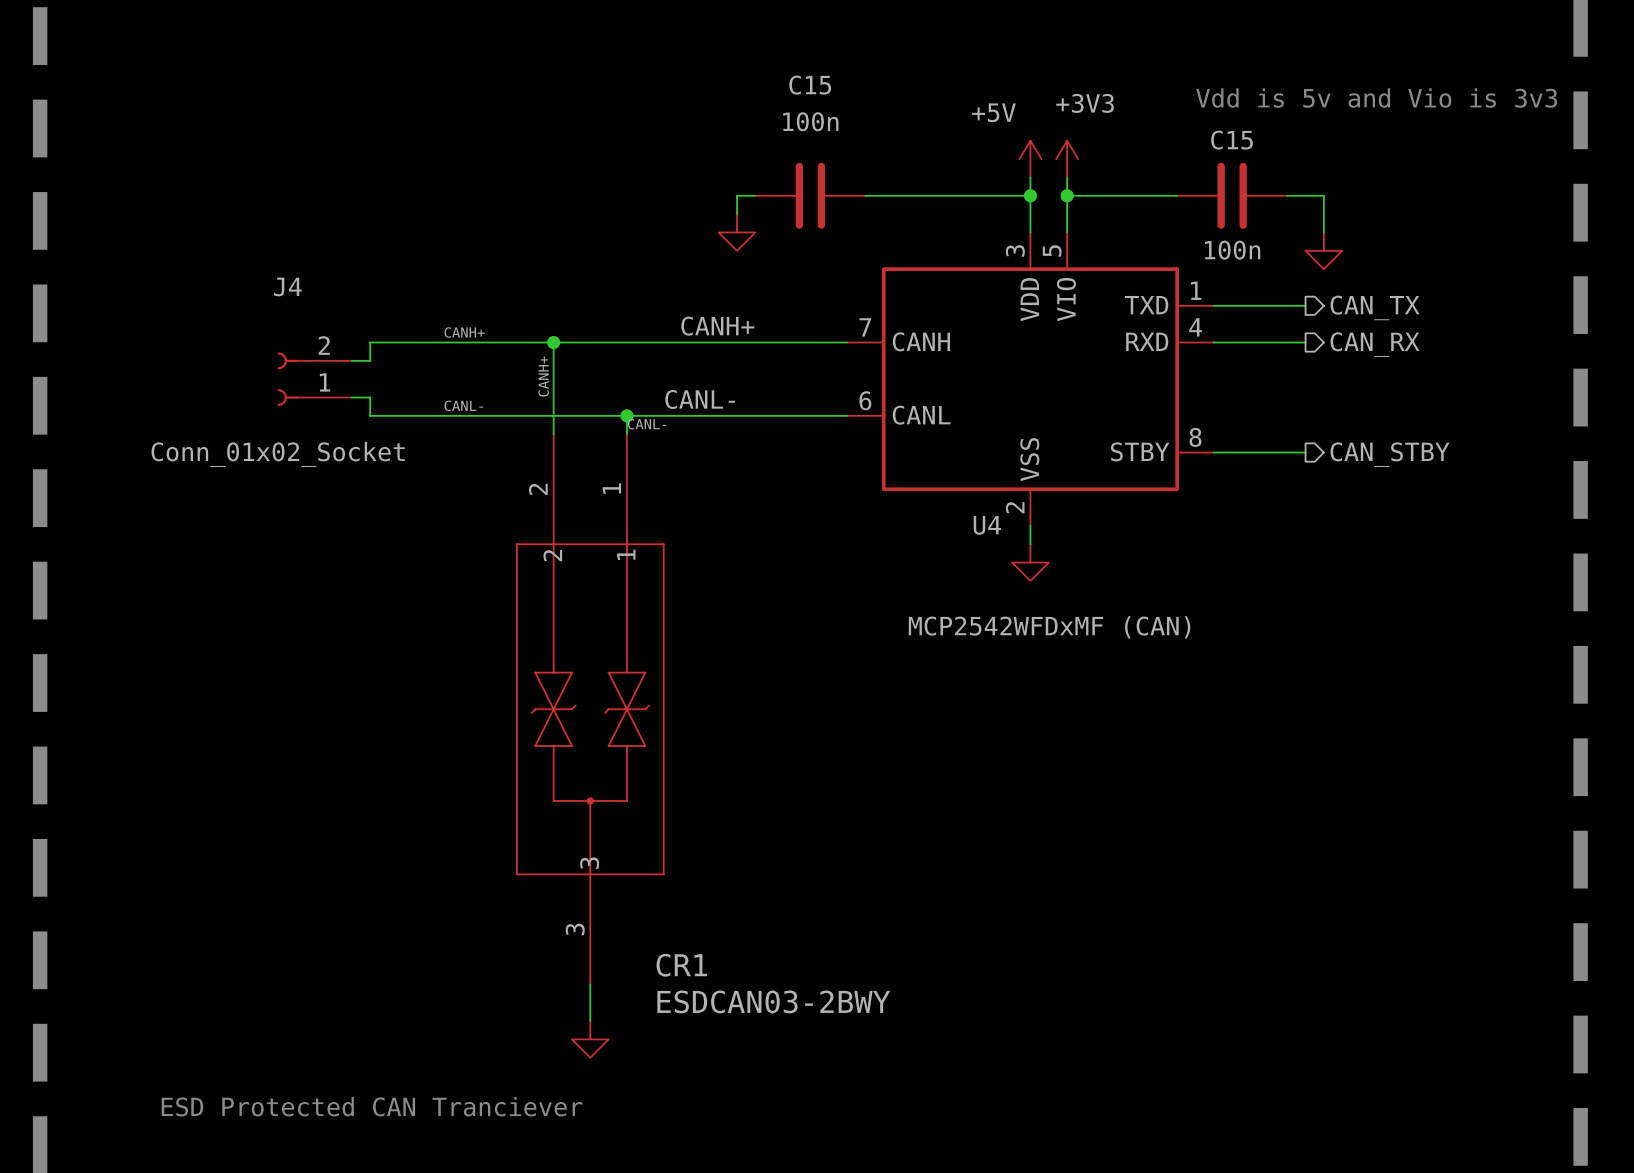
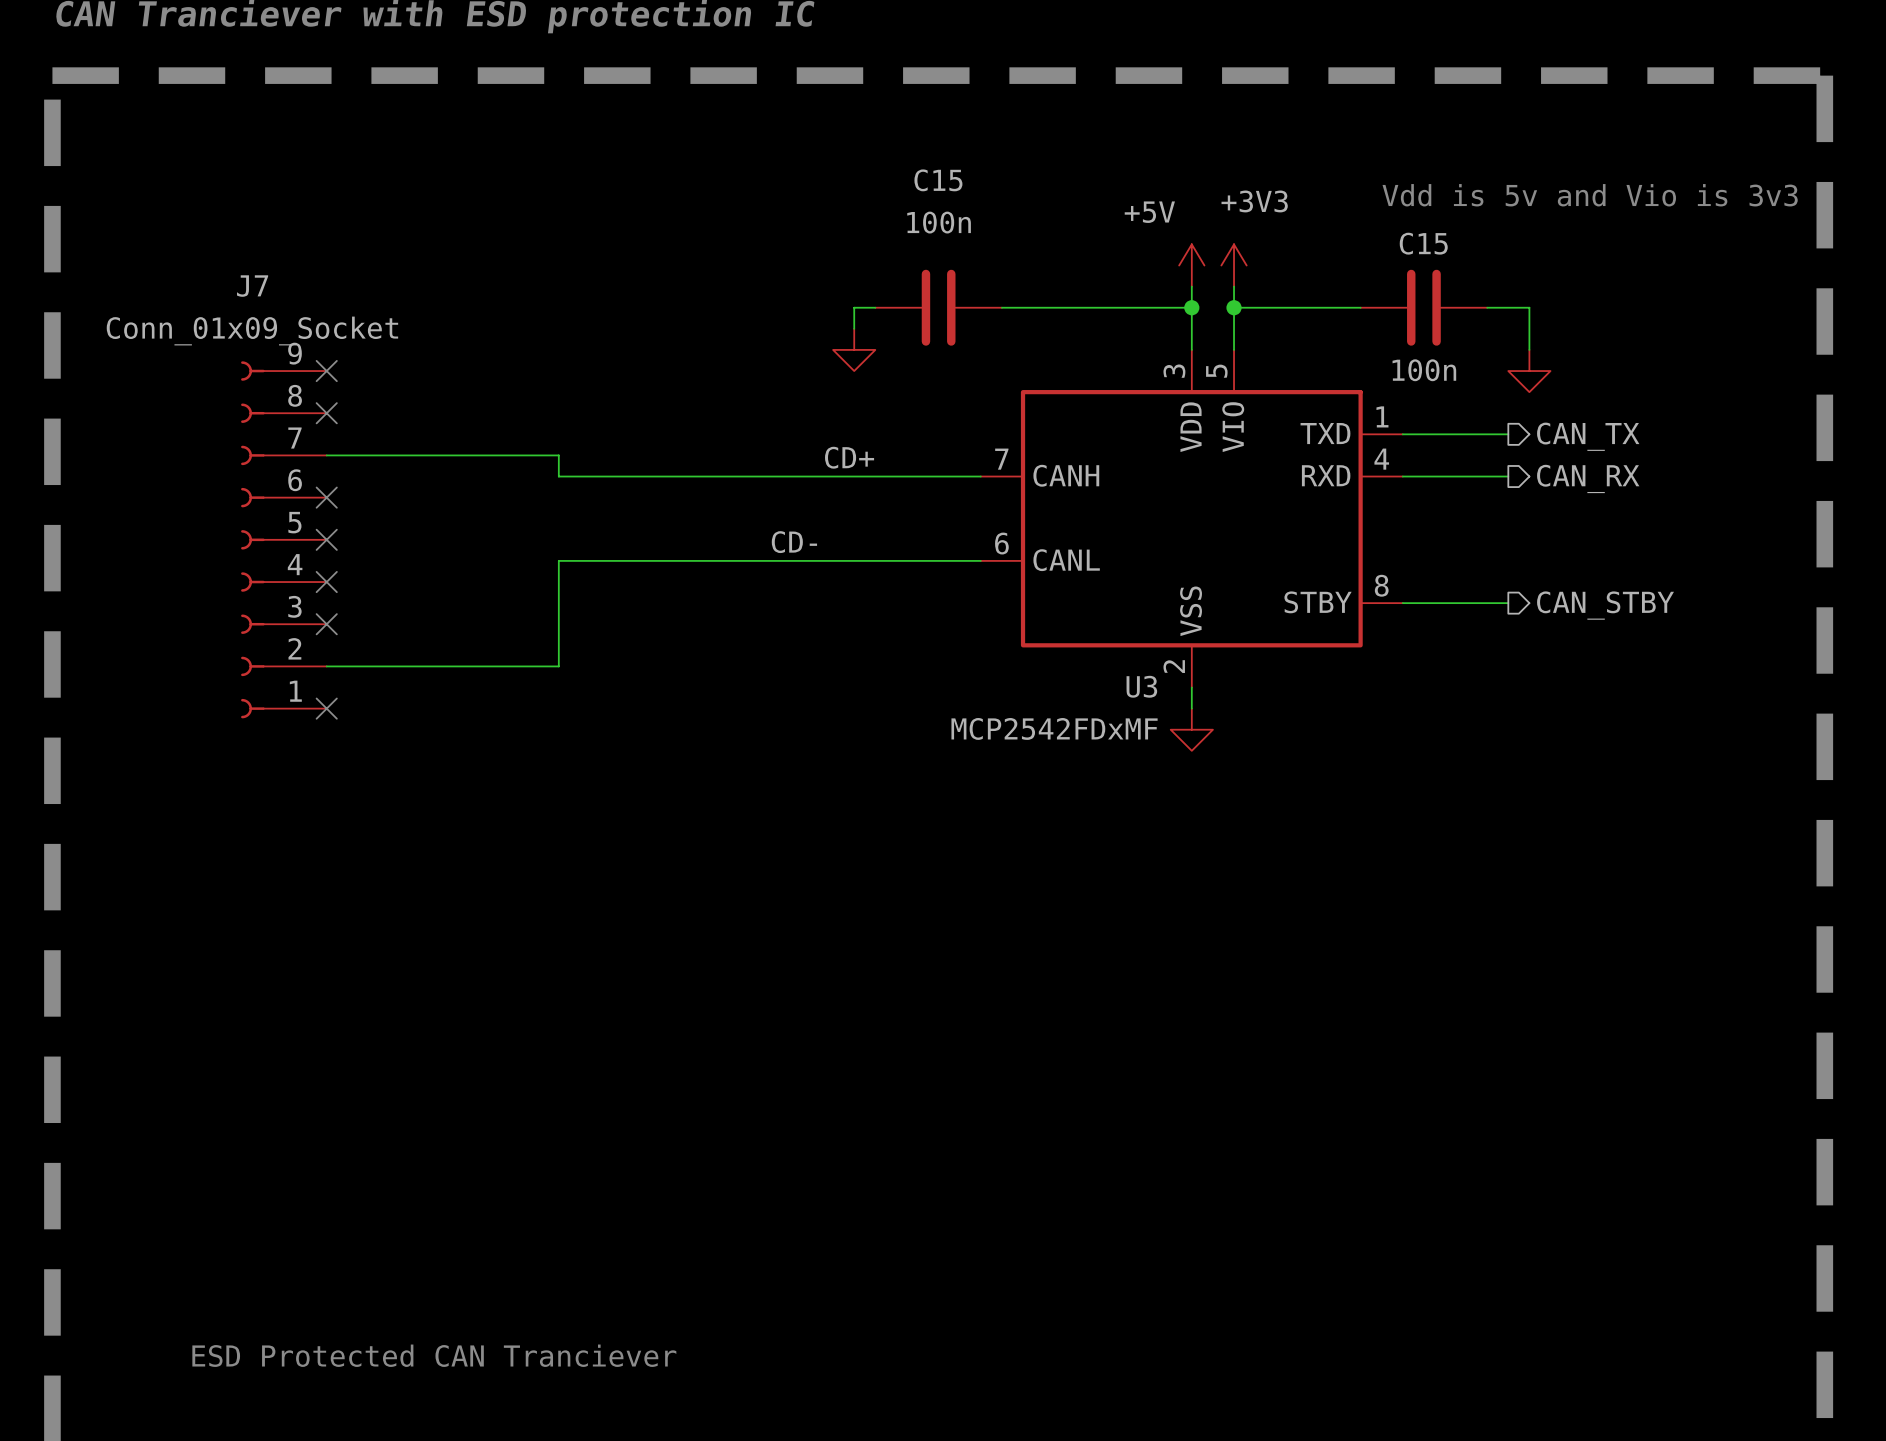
no-connect mark: none -> (326, 371)
no-connect mark: none -> (326, 413)
label: CANH+ (717, 326) -> CD+ (849, 457)
label: CANH+ (464, 332) -> none
wire: (480, 342) (370, 342) (370, 360) (351, 360) -> (558, 476) (558, 455) (326, 455)
wire: (553, 342) (553, 434) -> none
junction: (553, 342) -> none
no-connect mark: none -> (326, 497)
label: CANH+ (543, 376) -> none
J4: Conn_01x02_Socket (314, 379) -> none
J7: none -> Conn_01x09_Socket (283, 539)
no-connect mark: none -> (326, 539)
wire: (351, 397) (370, 397) (370, 415) (480, 415) -> (326, 666) (558, 666) (558, 560)
label: CANL- (700, 399) -> CD- (794, 542)
label: CANL- (463, 405) -> none
wire: (626, 415) (626, 434) -> none
junction: (626, 415) -> none
label: CANL- (647, 424) -> none
no-connect mark: none -> (326, 582)
no-connect mark: none -> (326, 624)
U4 name: U4 (987, 525) -> U3 (1141, 686)
no-connect mark: none -> (326, 708)
U4 value: MCP2542WFDxMF (CAN) (1049, 627) -> MCP2542FDxMF (1054, 728)
CR1: ESDCAN03-2BWY (590, 709) -> none
wire: (590, 984) (590, 1021) -> none
power symbol: (590, 1039) -> none

